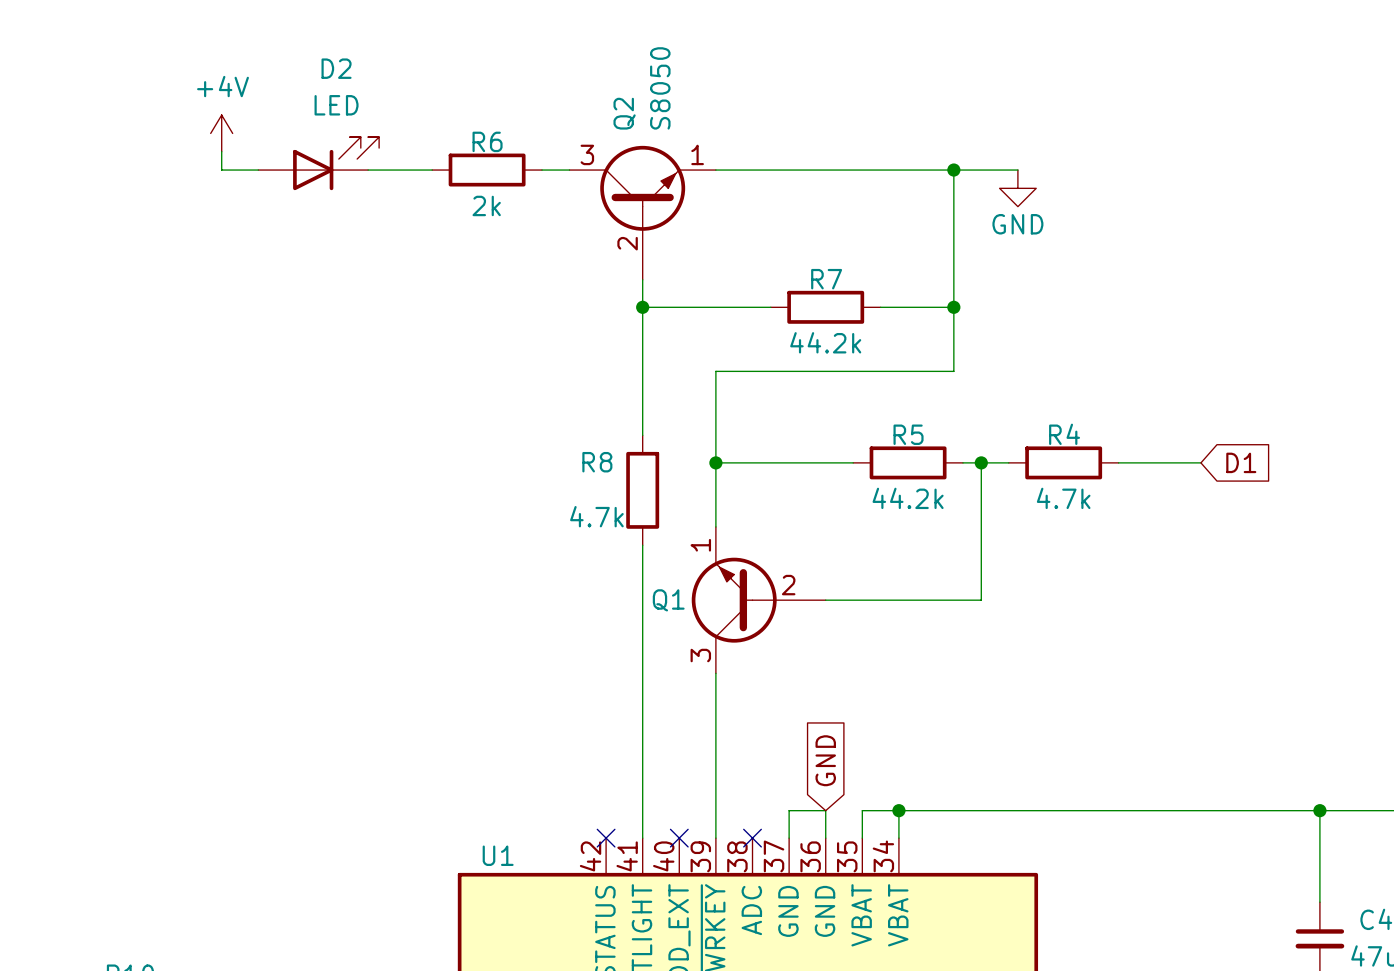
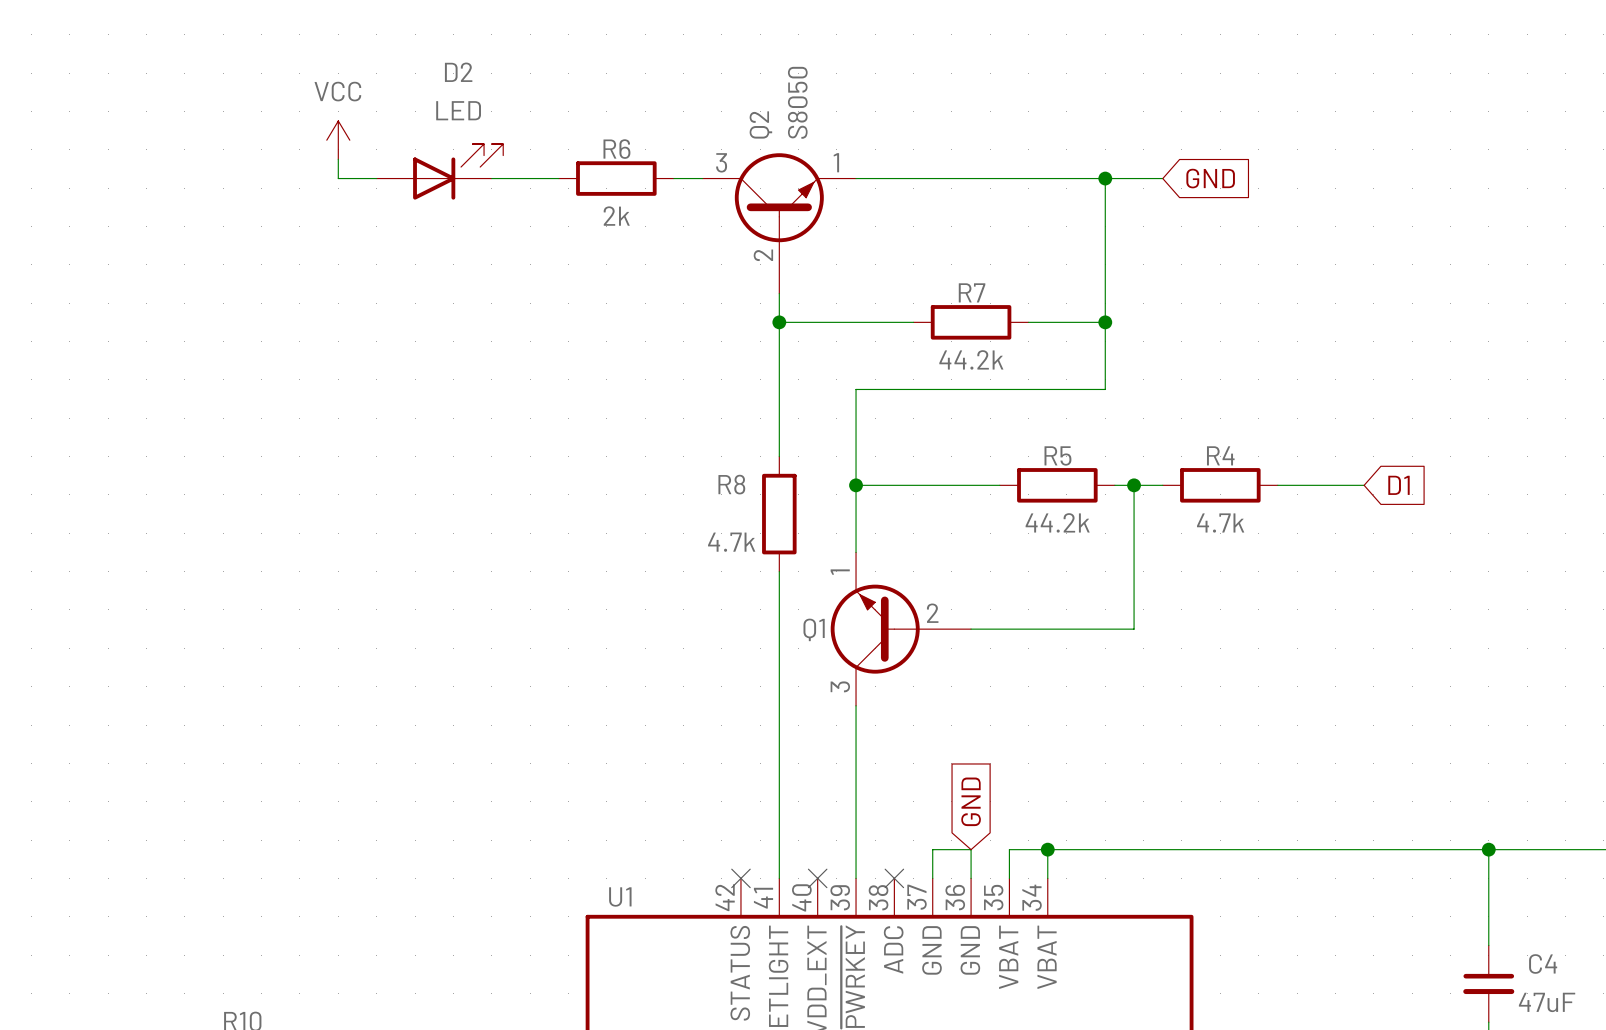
power symbol: +4V (221, 133) -> VCC (338, 140)
wire: (1008, 170) (1017, 170) -> none
global label: none -> GND (1210, 178)
power symbol: GND (1017, 188) -> none

